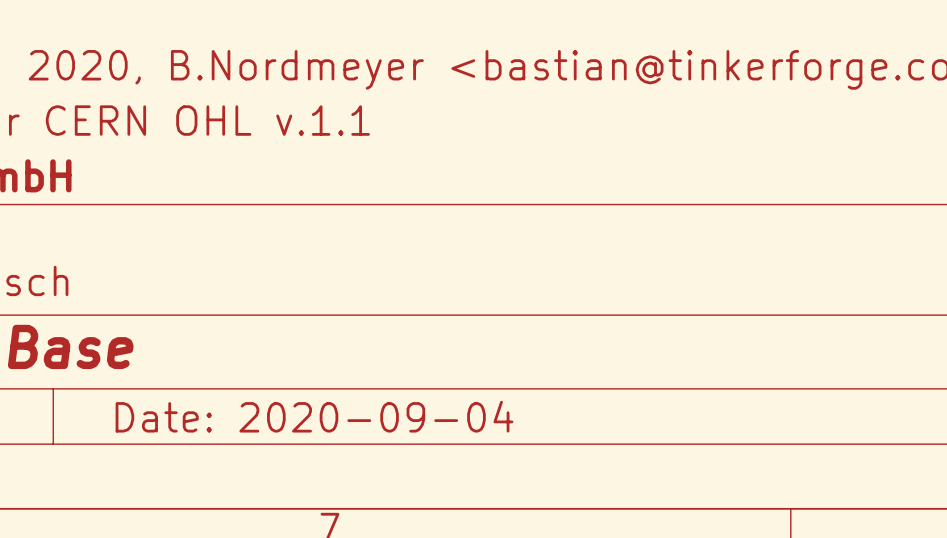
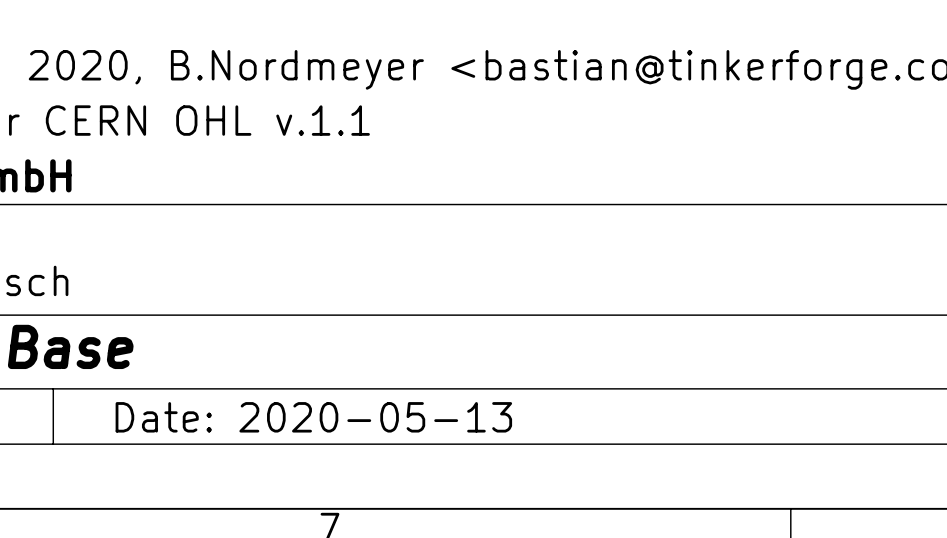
title block: Date: 2020-09-04 (314, 416) -> Date: 2020-05-13 (313, 417)

